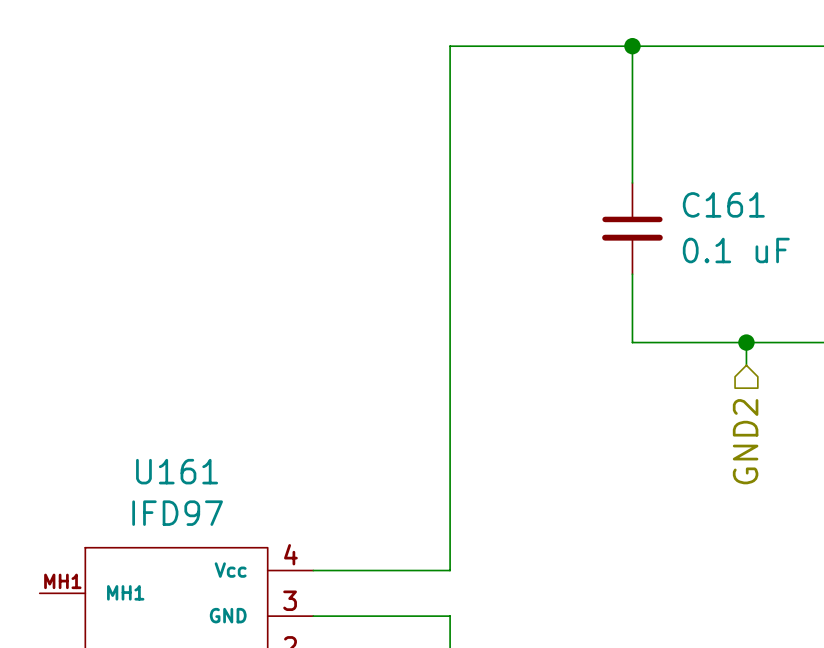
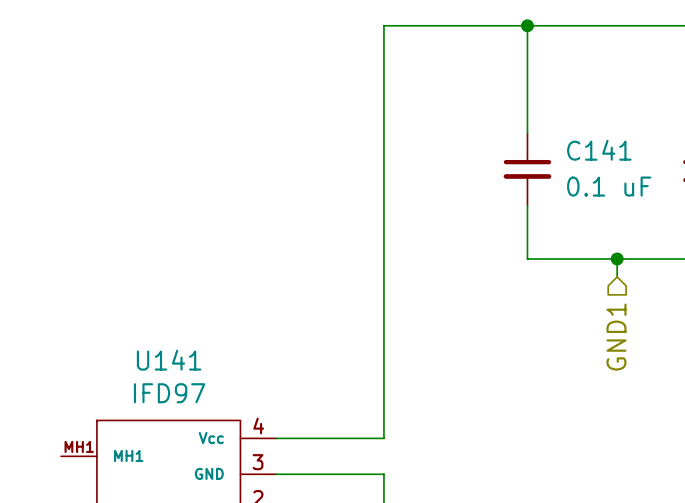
C161 name: C161 (723, 204) -> C141 (599, 150)
hierarchical label: GND2 (745, 441) -> GND1 (616, 337)
U161 name: U161 (177, 471) -> U141 (169, 360)

